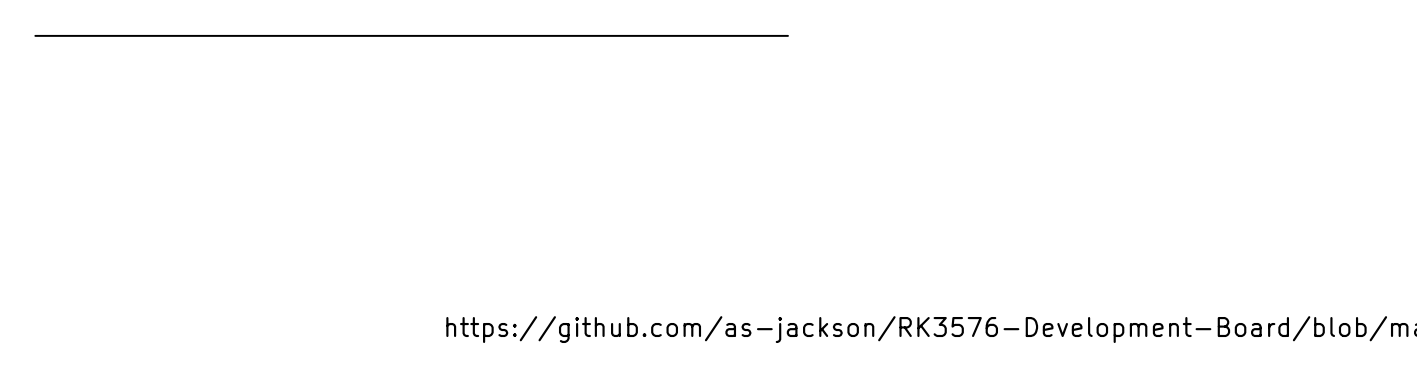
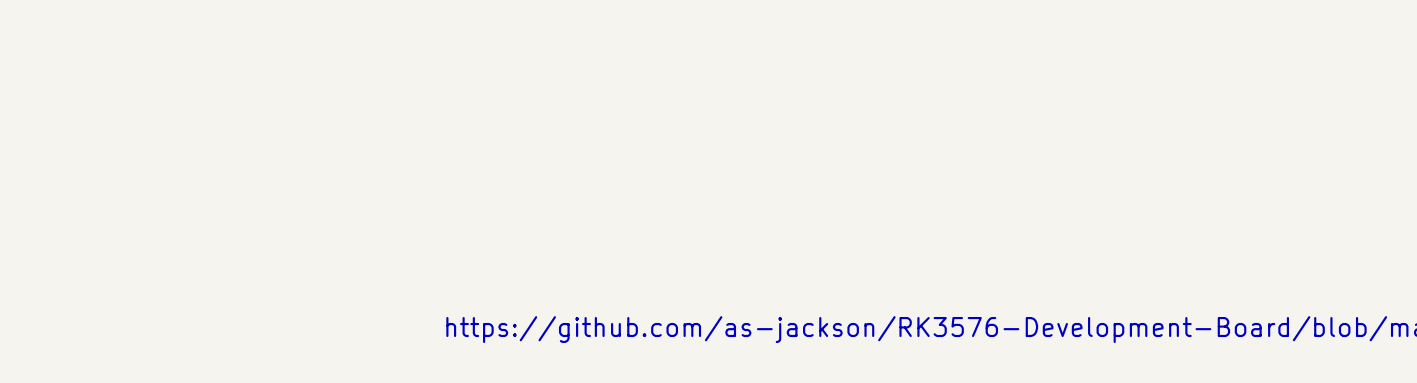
bus: (35, 35) (787, 35) -> none

